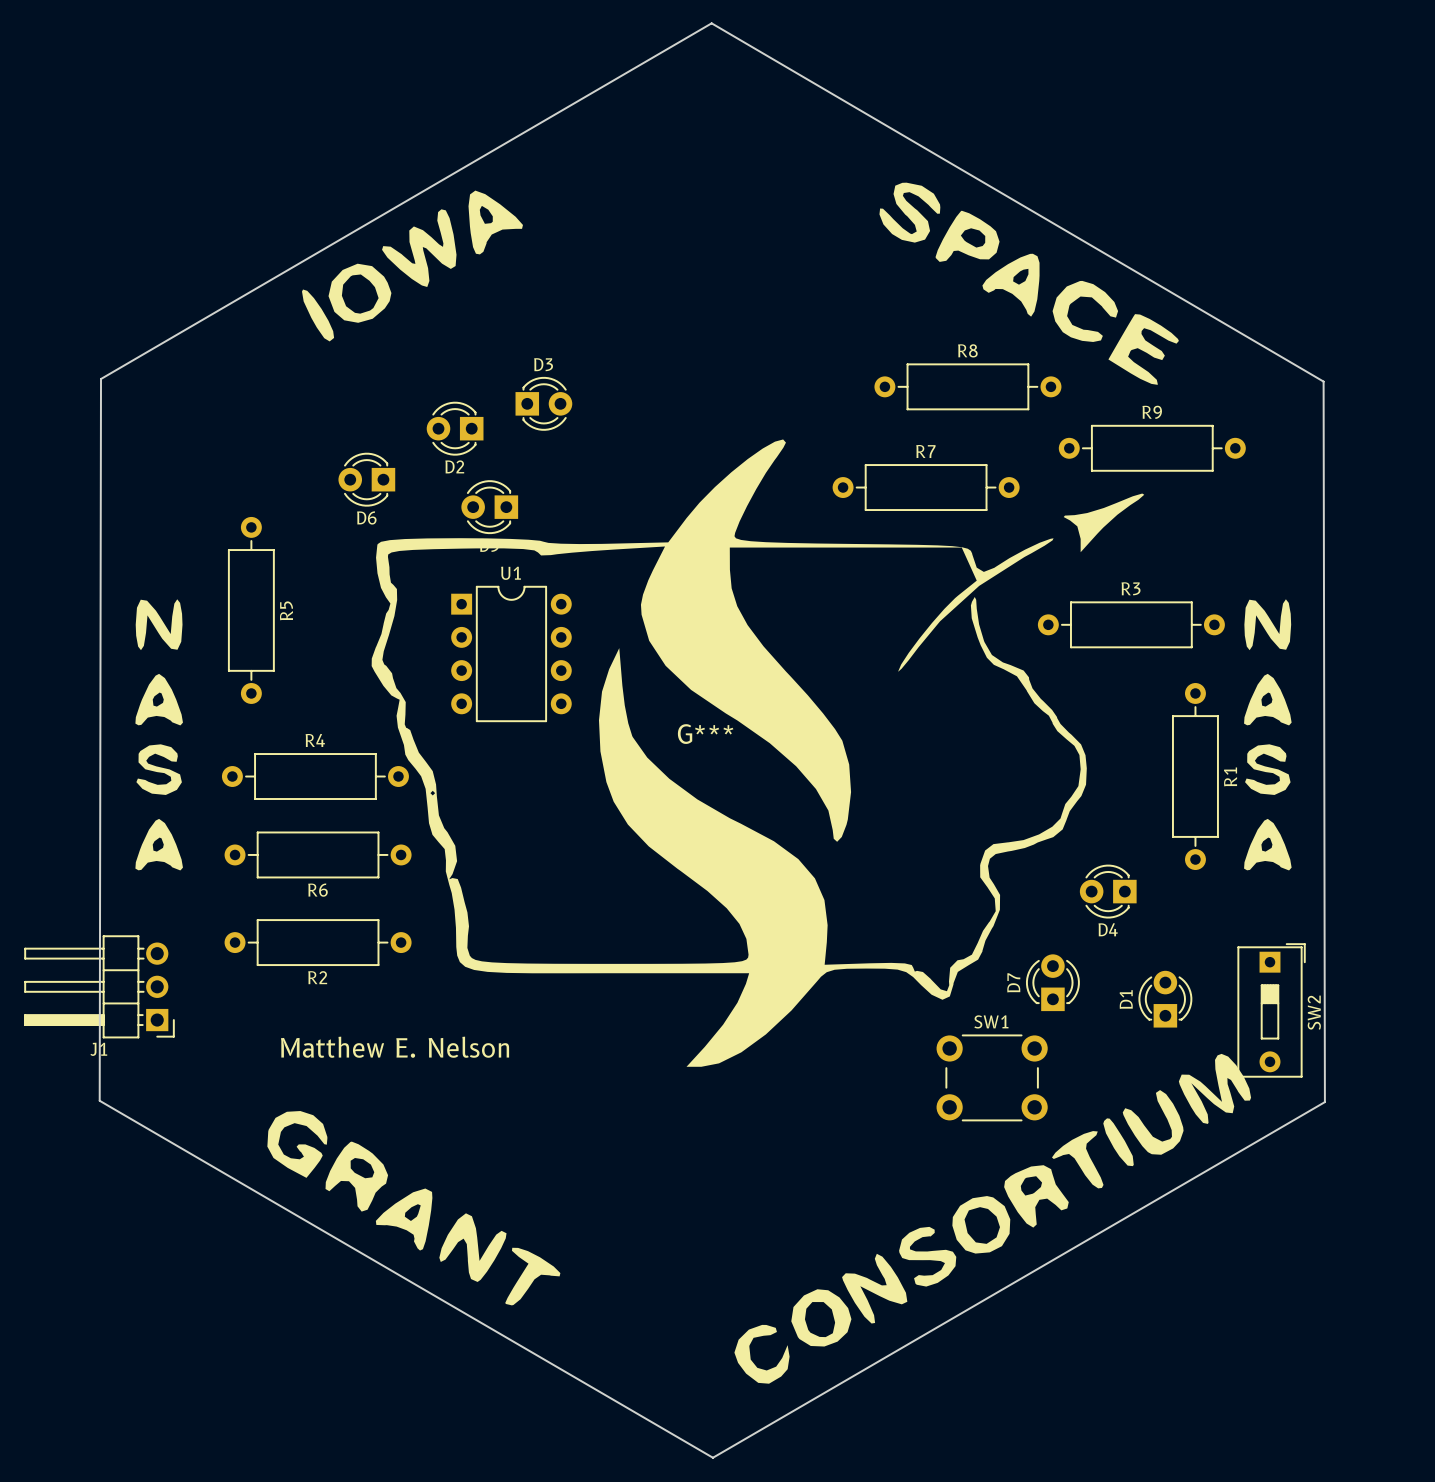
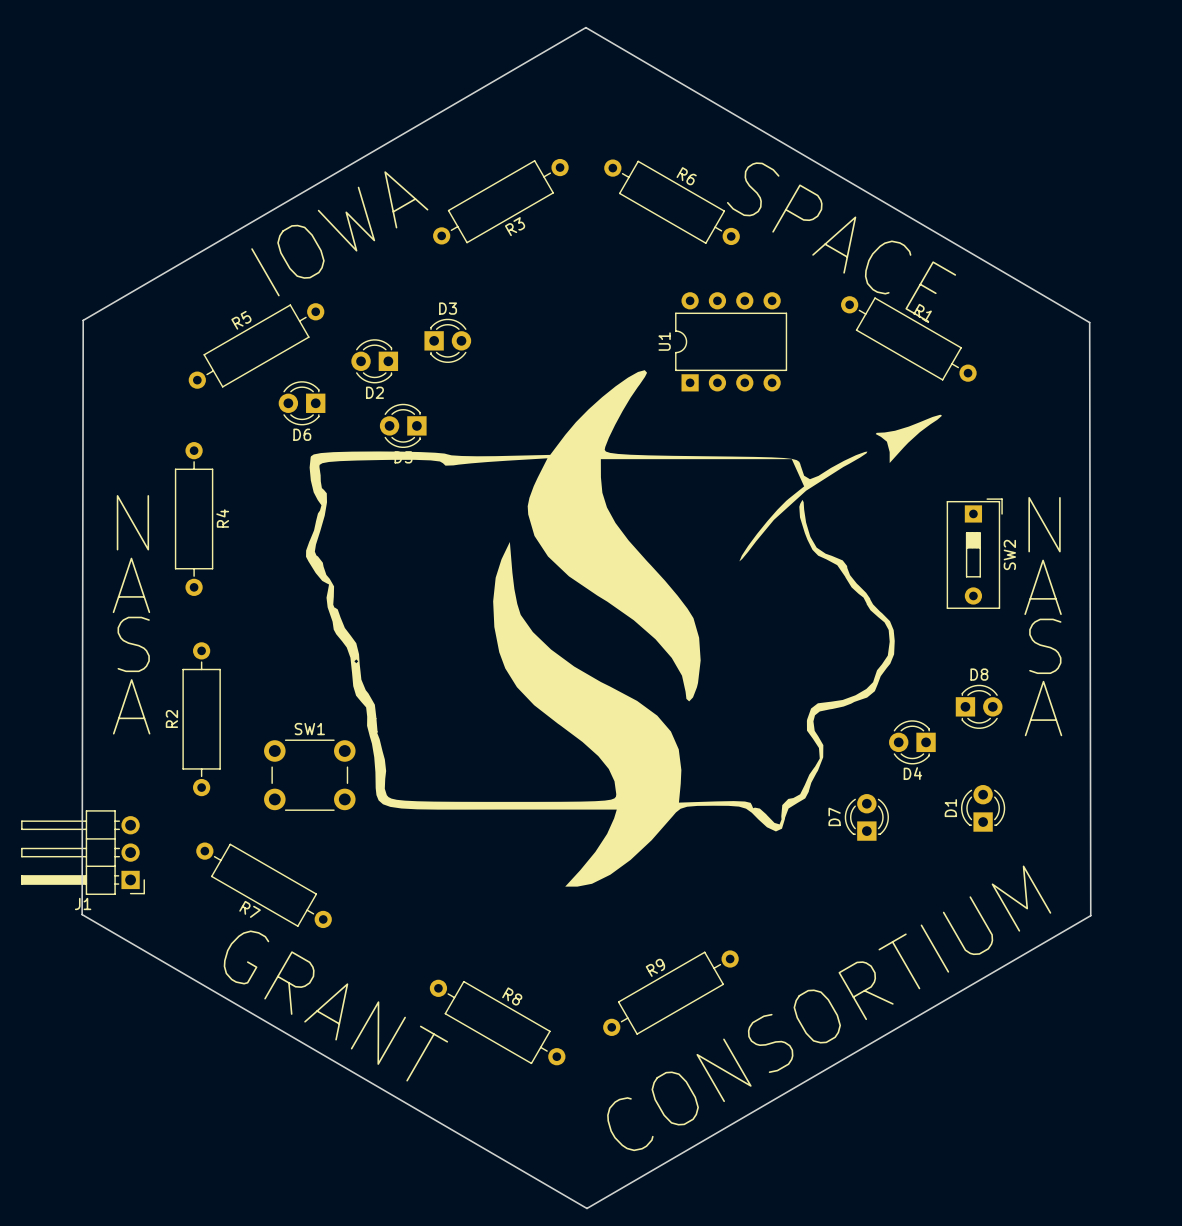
R8 rotation: 0° (967, 386) -> 30° clockwise (497, 1022)
R8 position: (967, 386) -> (497, 1022)
drawing: none -> [306, 370, 943, 887]
R9 rotation: 0° (1152, 448) -> 30° counterclockwise (670, 993)
R9 position: (1152, 448) -> (670, 993)
R7 name position: R7 (925, 451) -> R7 (250, 909)
R7 rotation: 0° (926, 487) -> 30° clockwise (264, 885)
R7 position: (926, 487) -> (264, 885)
R3 name position: R3 (1131, 588) -> R3 (515, 226)
R5 rotation: 0° (251, 610) -> 60° clockwise (256, 345)
R5 position: (251, 610) -> (256, 345)
R5 name position: R5 (286, 610) -> R5 (241, 320)
R3 rotation: 0° (1131, 624) -> 30° counterclockwise (500, 201)
R3 position: (1131, 624) -> (500, 201)
U1 rotation: 0° (511, 653) -> 90° counterclockwise (731, 341)
U1 position: (511, 653) -> (731, 341)
R4 rotation: 0° (315, 776) -> 90° clockwise (194, 519)
R4 position: (315, 776) -> (194, 519)
R1 rotation: 0° (1195, 776) -> 60° counterclockwise (908, 338)
R1 position: (1195, 776) -> (908, 338)
G***: (713, 783) -> none
D8: none -> (979, 706)
R6 rotation: 0° (318, 854) -> 30° clockwise (672, 202)
R6 position: (318, 854) -> (672, 202)
R6 name position: R6 (317, 890) -> R6 (686, 176)
R2 rotation: 0° (318, 942) -> 90° clockwise (201, 719)
J1 position: (99, 986) -> (83, 852)
D1 position: (1165, 999) -> (983, 808)
SW2 position: (1271, 1010) -> (974, 553)
text: Matthew E. Nelson (395, 1047) -> none
SW1 position: (992, 1077) -> (309, 775)

